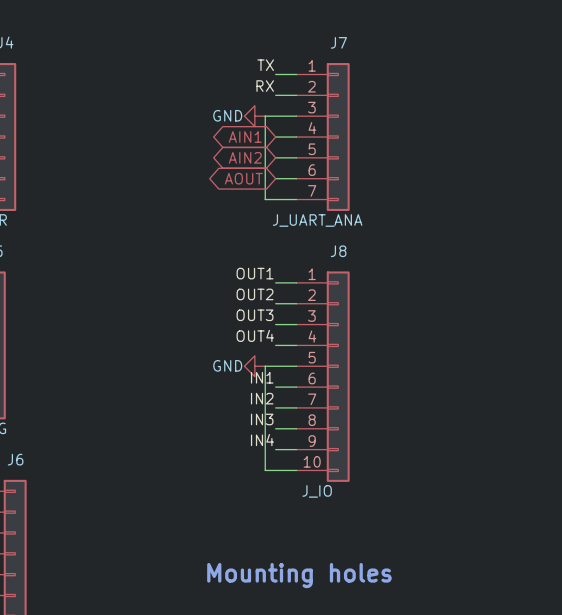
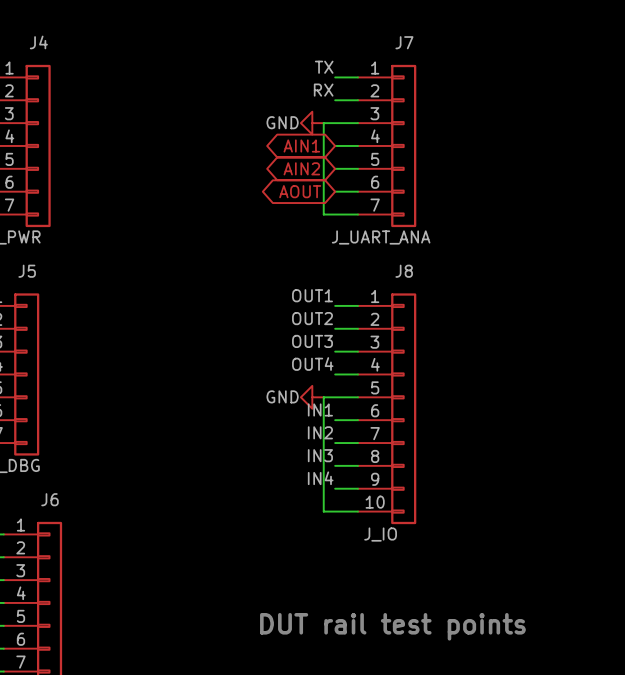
text: Mounting holes (299, 575) -> DUT rail test points (392, 626)

